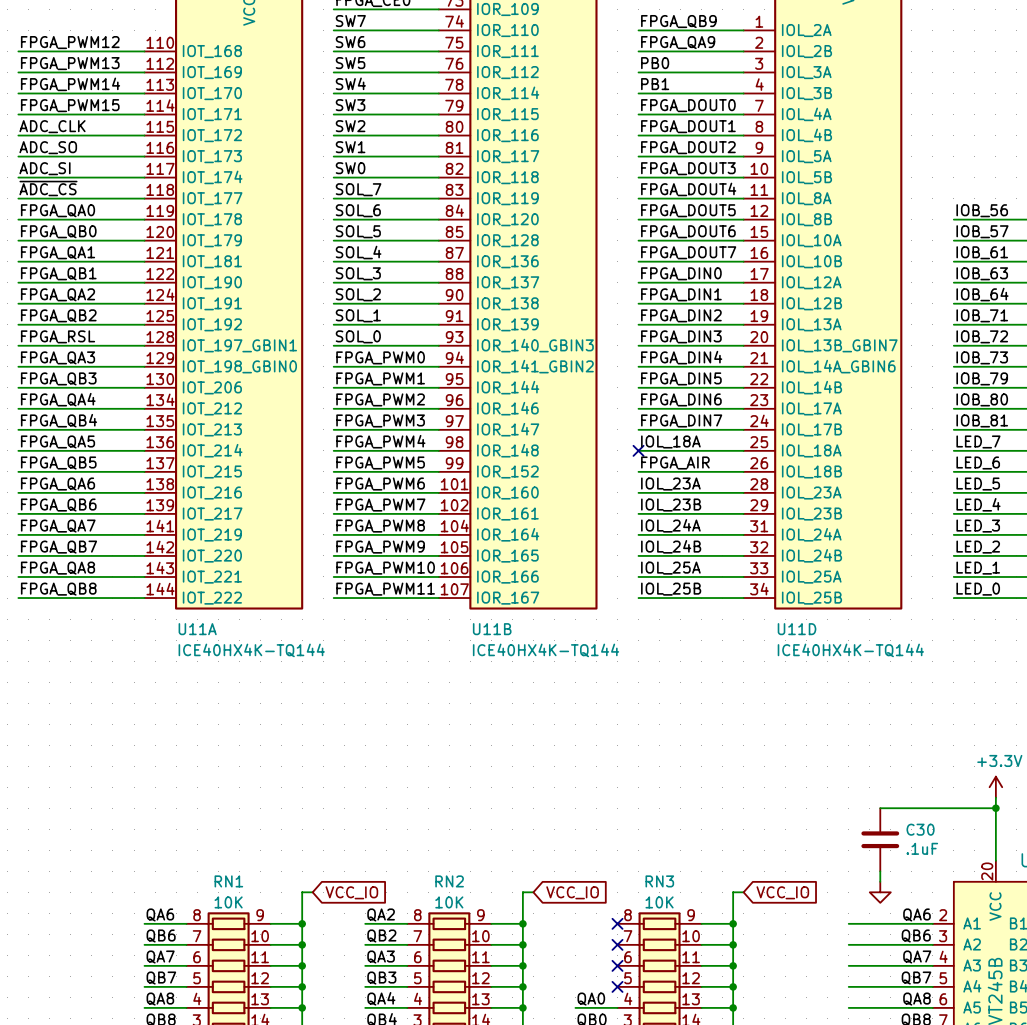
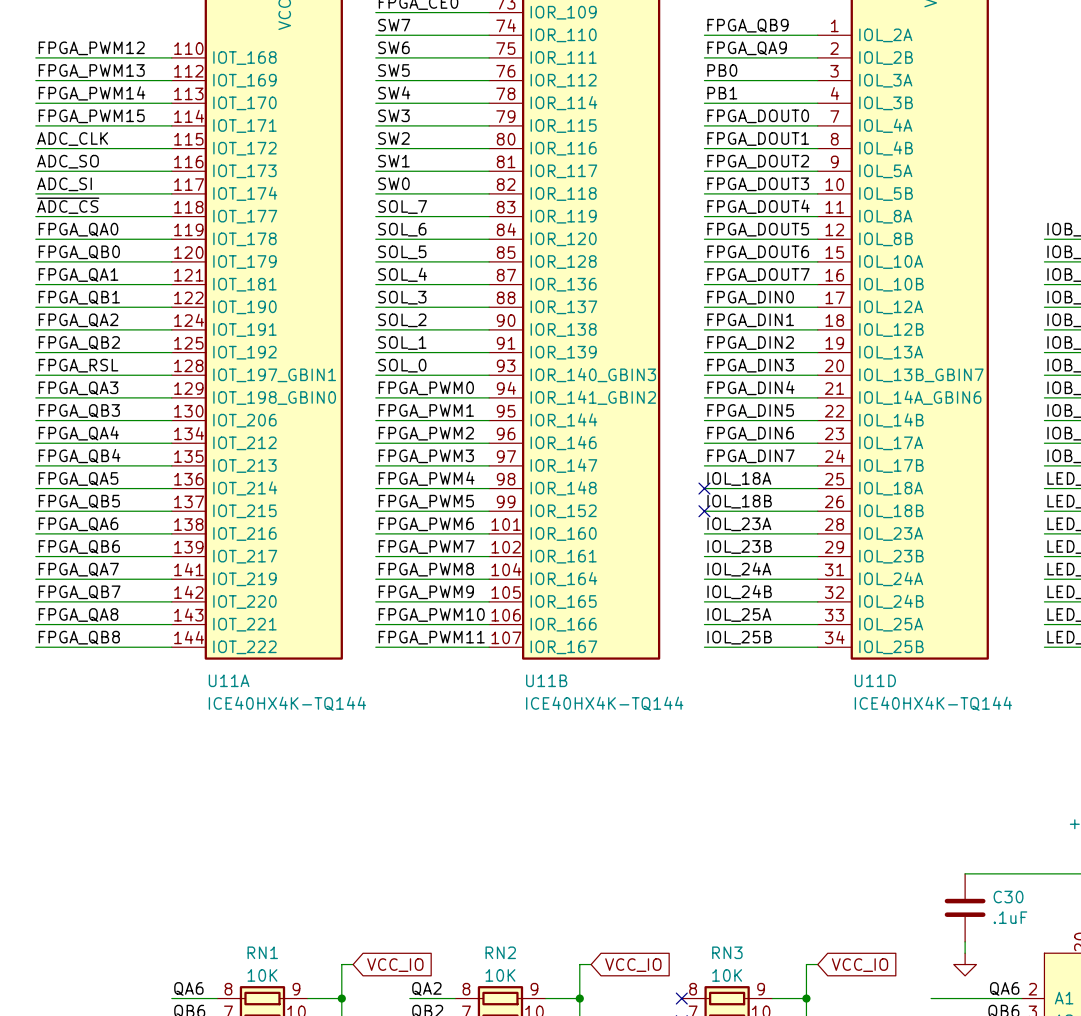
label: FPGA_AIR (675, 463) -> IOL_18B (739, 501)
no-connect mark: none -> (704, 511)

